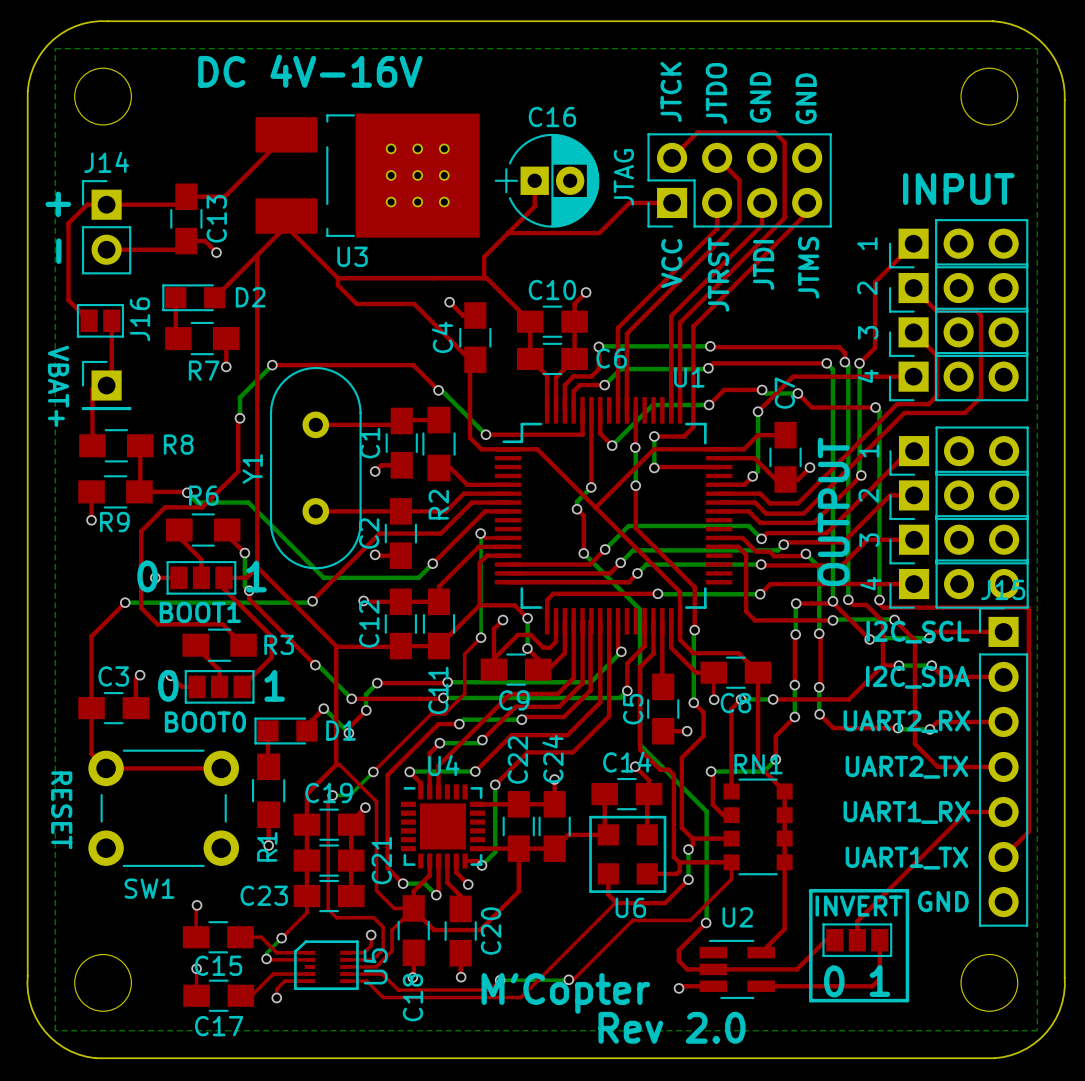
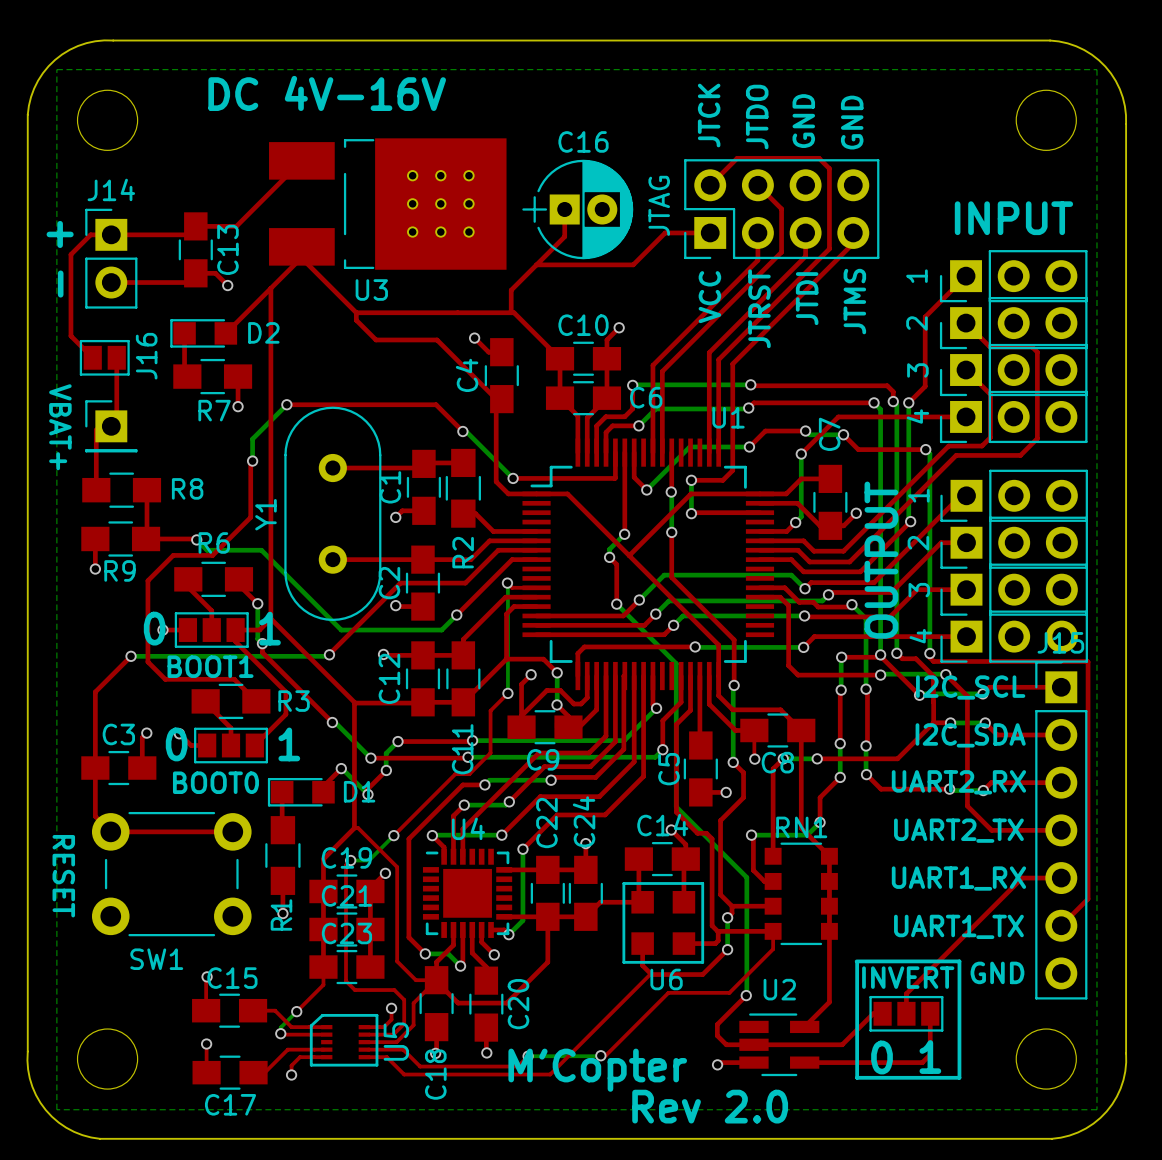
C21 name rotation: 0° (381, 860) -> 90° clockwise (346, 895)
C23 name position: C23 (264, 895) -> C23 (346, 933)
C15 name position: C15 (218, 965) -> C15 (232, 978)

